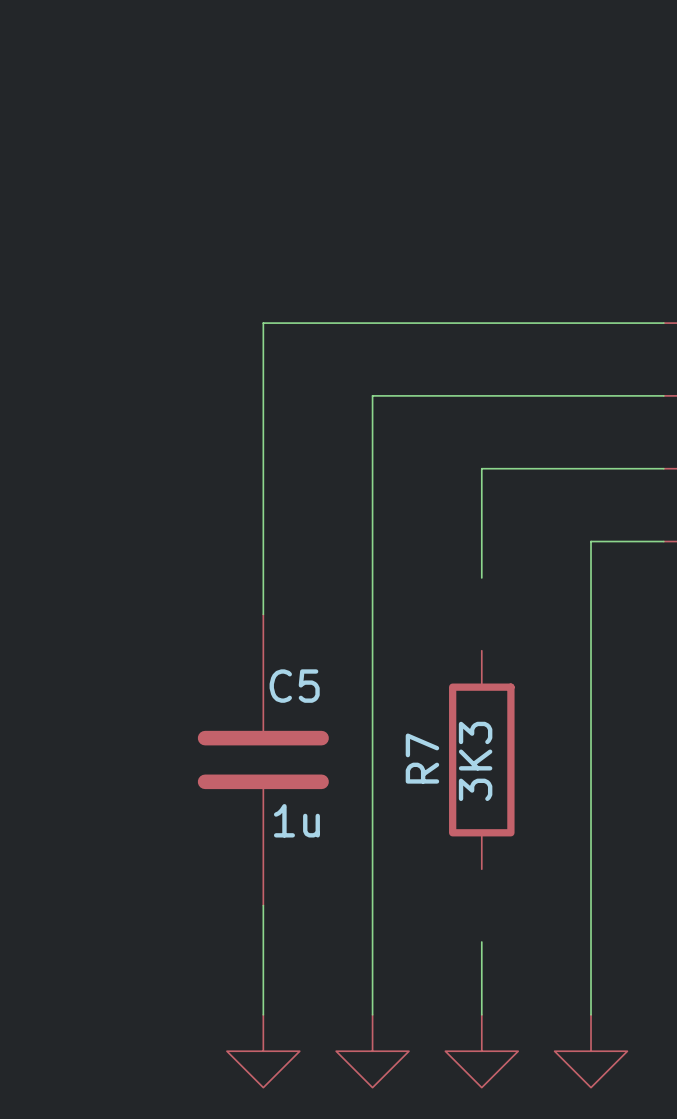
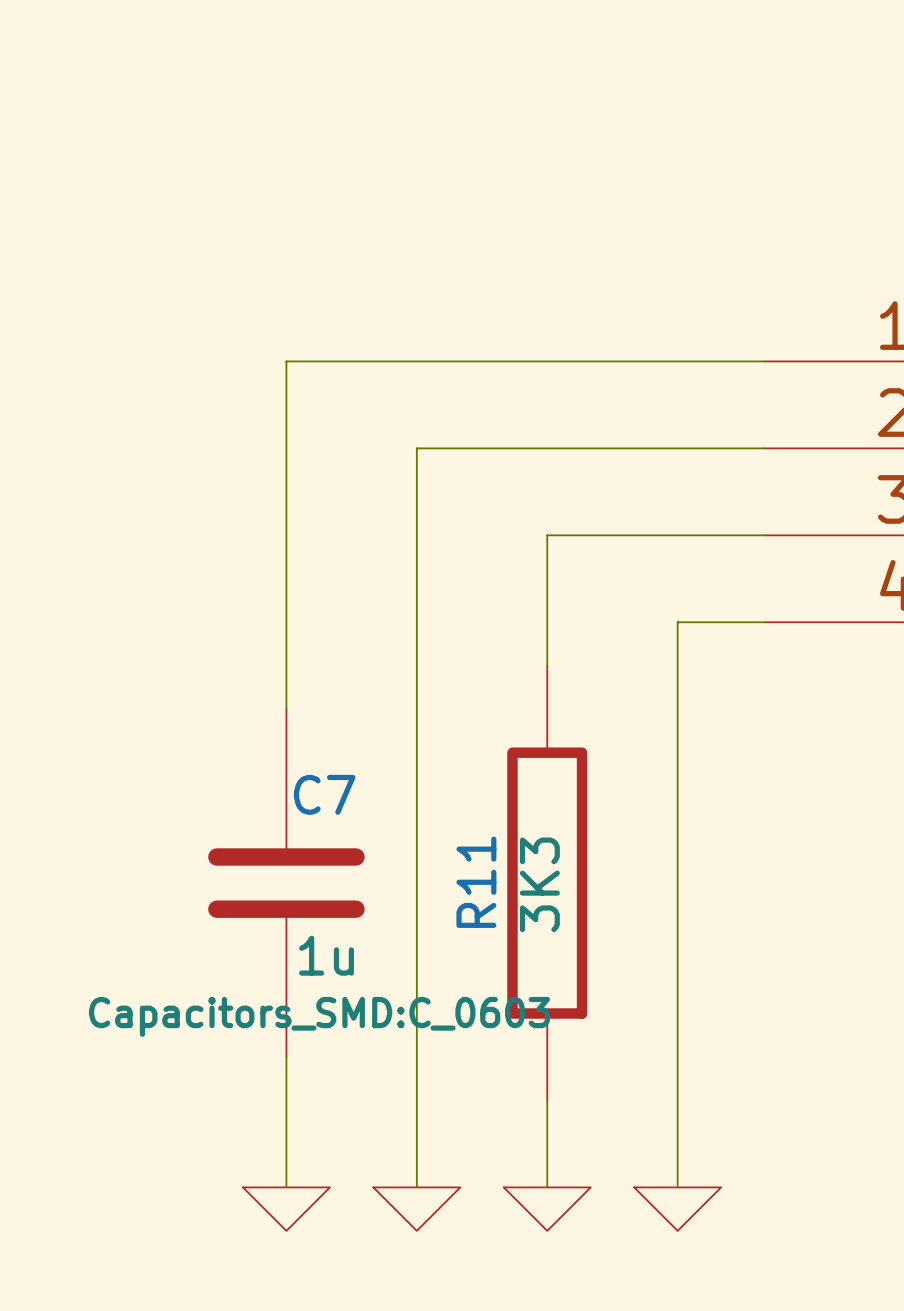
C5 name: C5 (294, 686) -> C7 (324, 794)
R7: 3K3 (481, 759) -> none
R11: none -> 3K3 (547, 883)
C5 text: none -> Capacitors_SMD:C_0603 (319, 1016)
power symbol shape: [226, 1014, 300, 1088] -> [242, 1187, 330, 1231]
power symbol shape: [336, 1014, 409, 1088] -> [373, 1187, 461, 1231]
power symbol shape: [445, 1014, 519, 1088] -> [503, 1187, 591, 1231]
power symbol shape: [554, 1014, 628, 1088] -> [634, 1187, 722, 1231]

